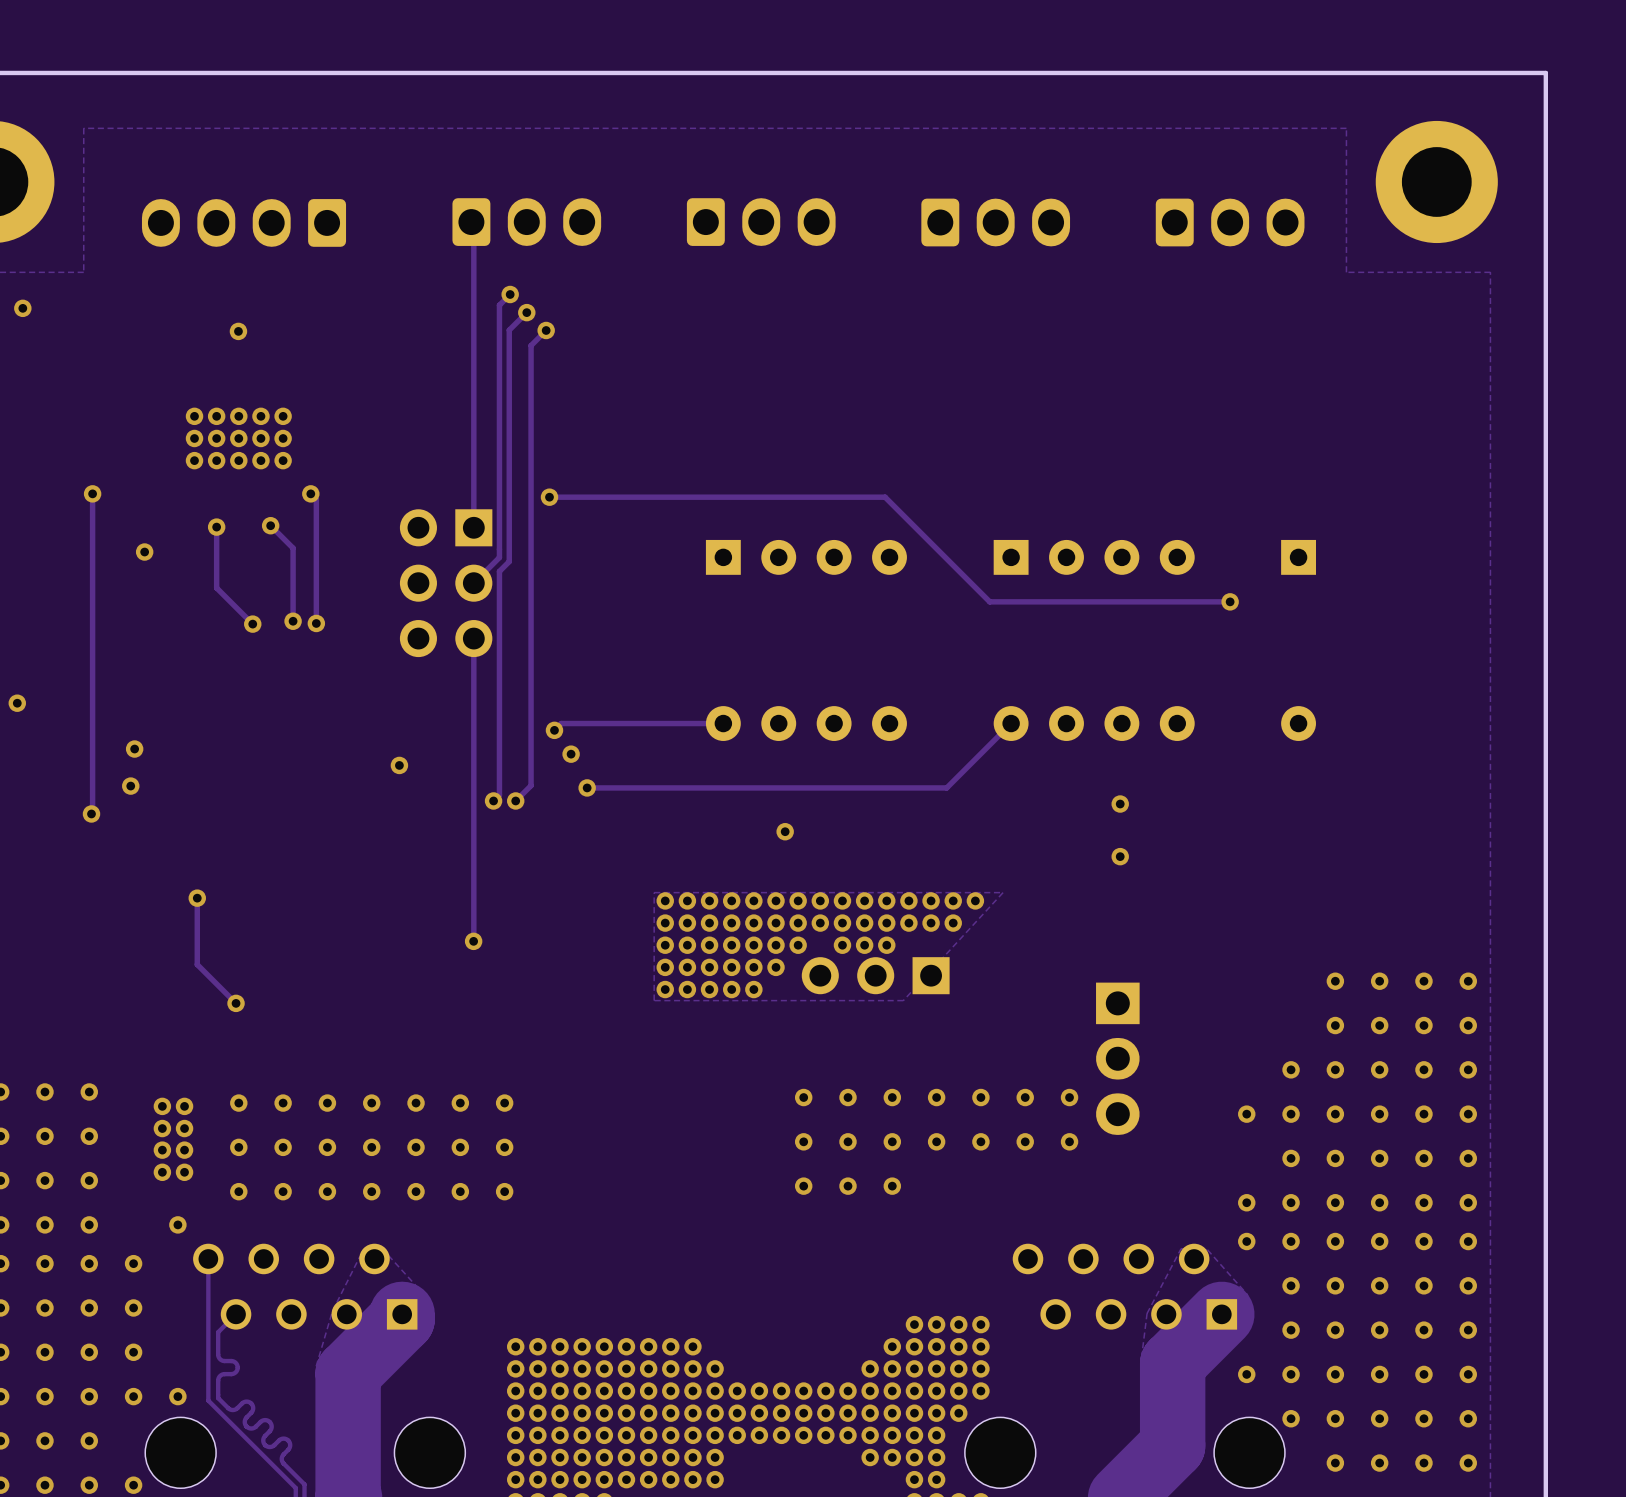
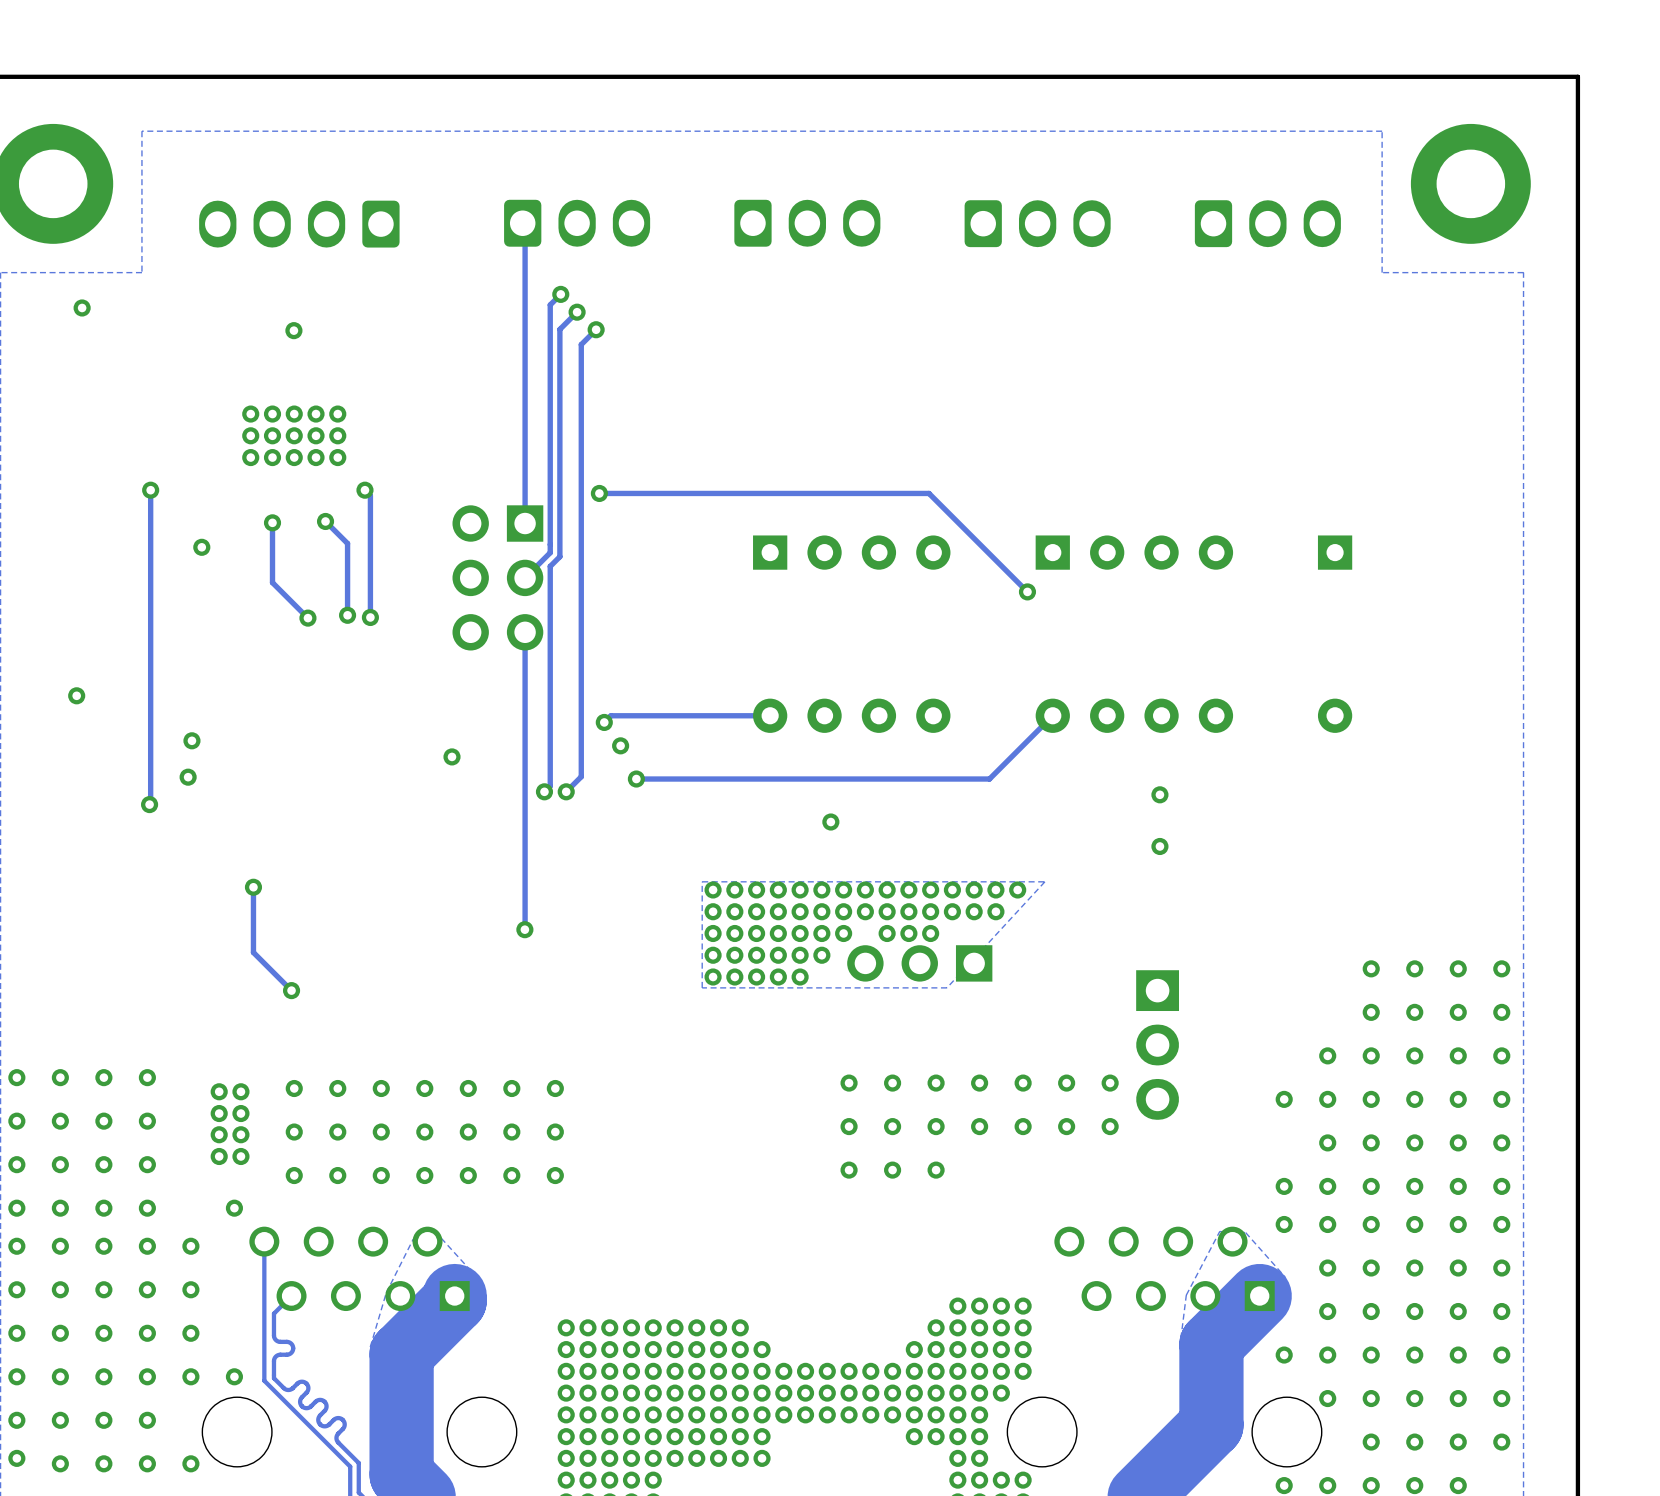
track: (985, 597) (989, 601) (1230, 601) -> none
via: none -> (1027, 591)
via: (1230, 601) -> none

